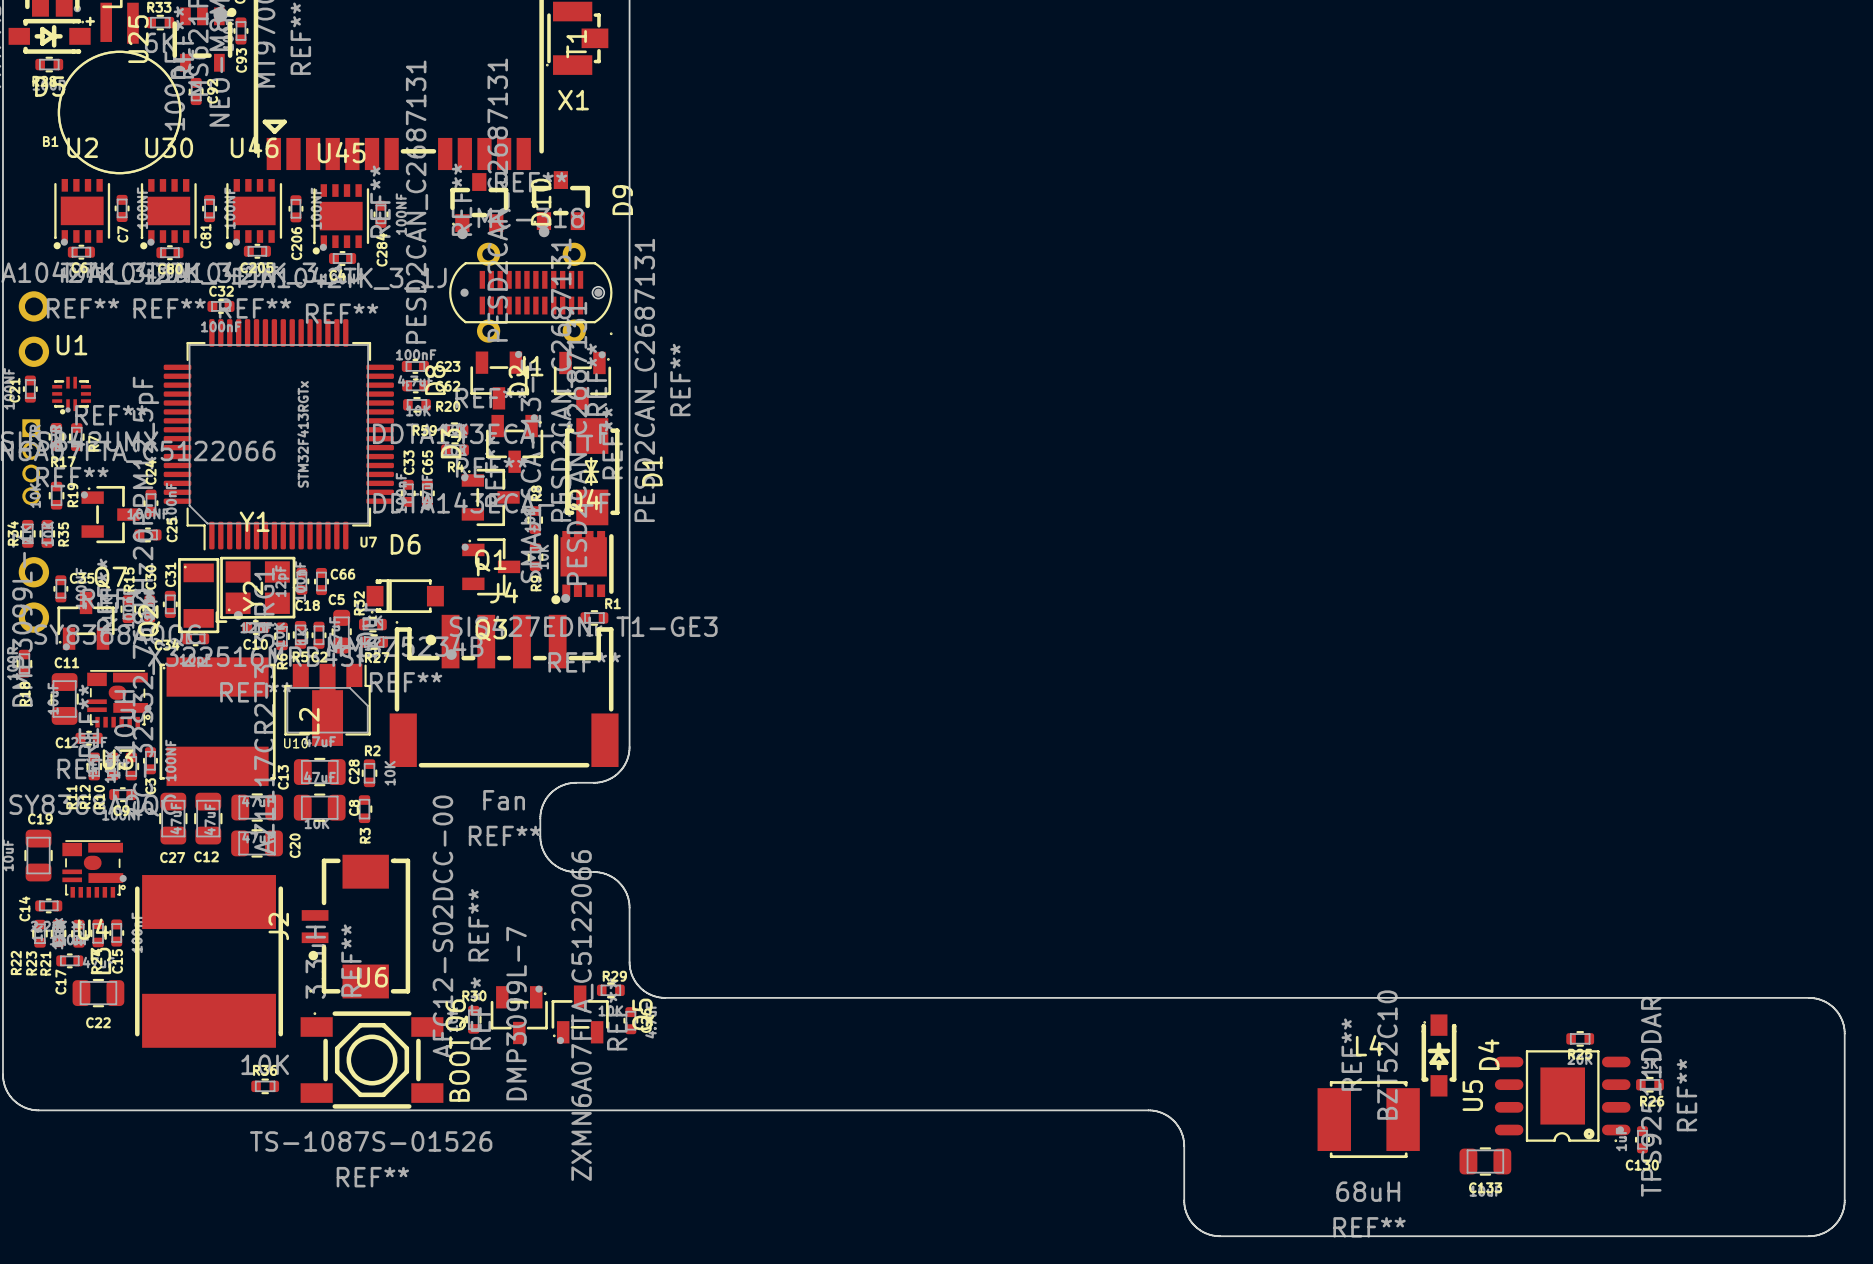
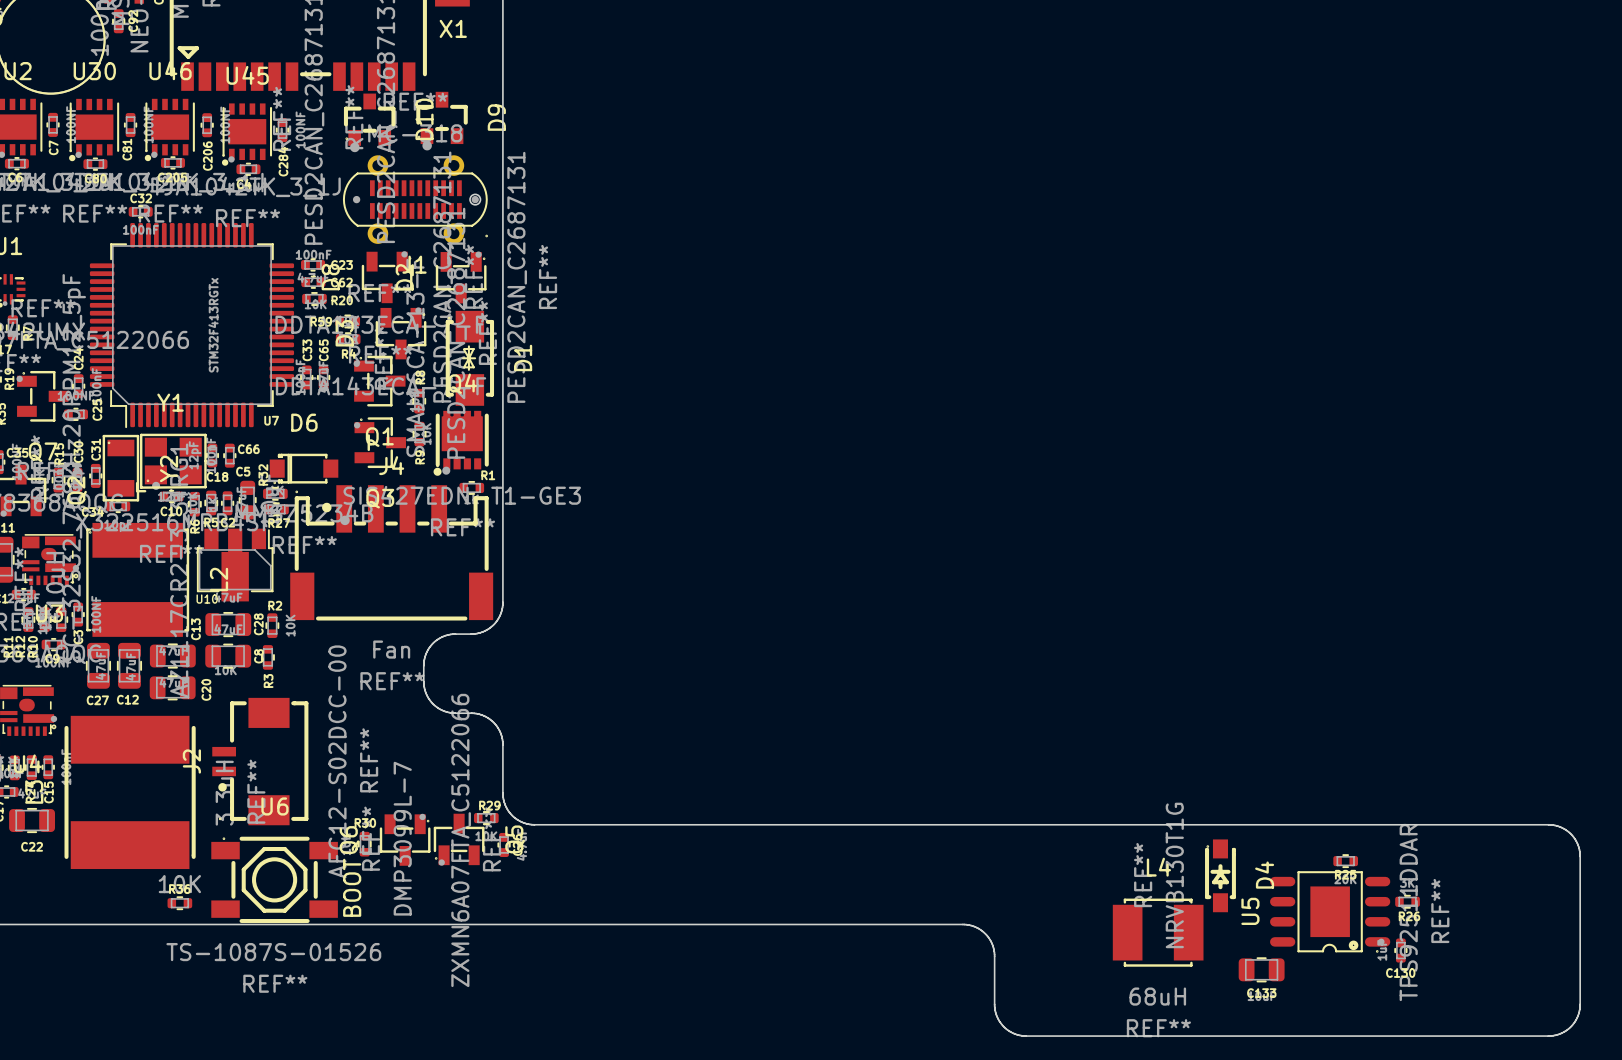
D4 value: BZT52C10 (1387, 1055) -> NRVB130T1G (1174, 875)

